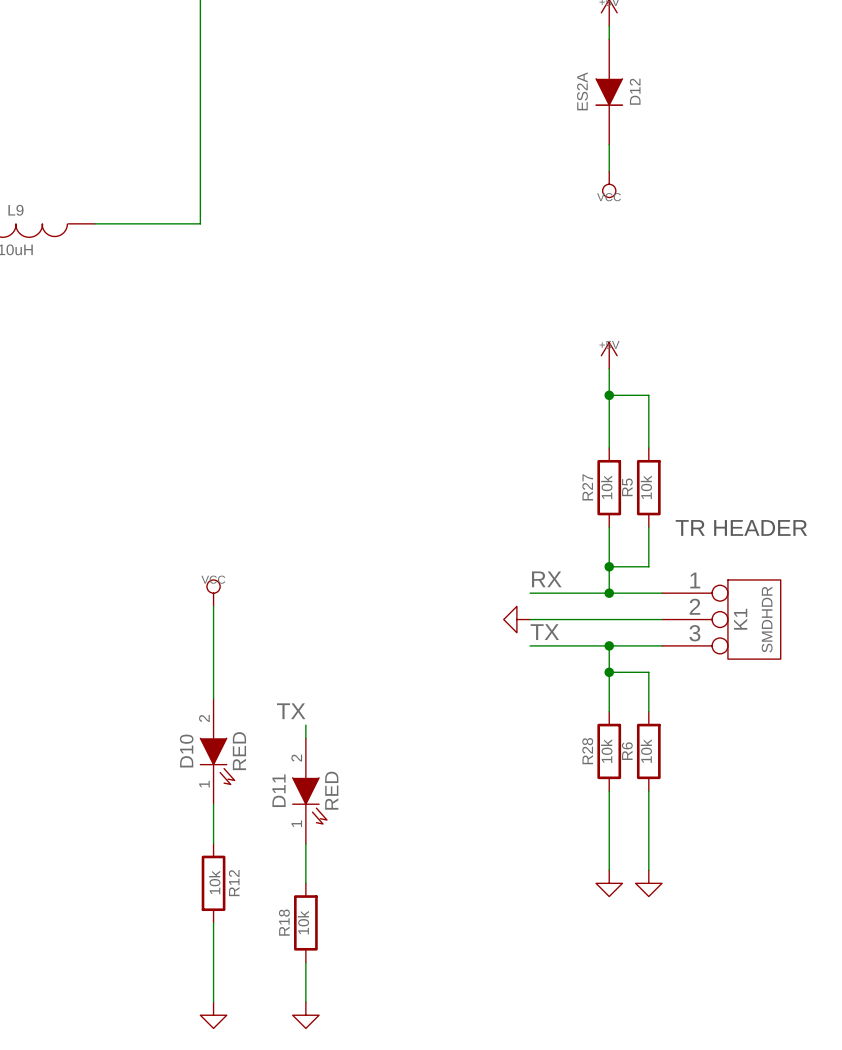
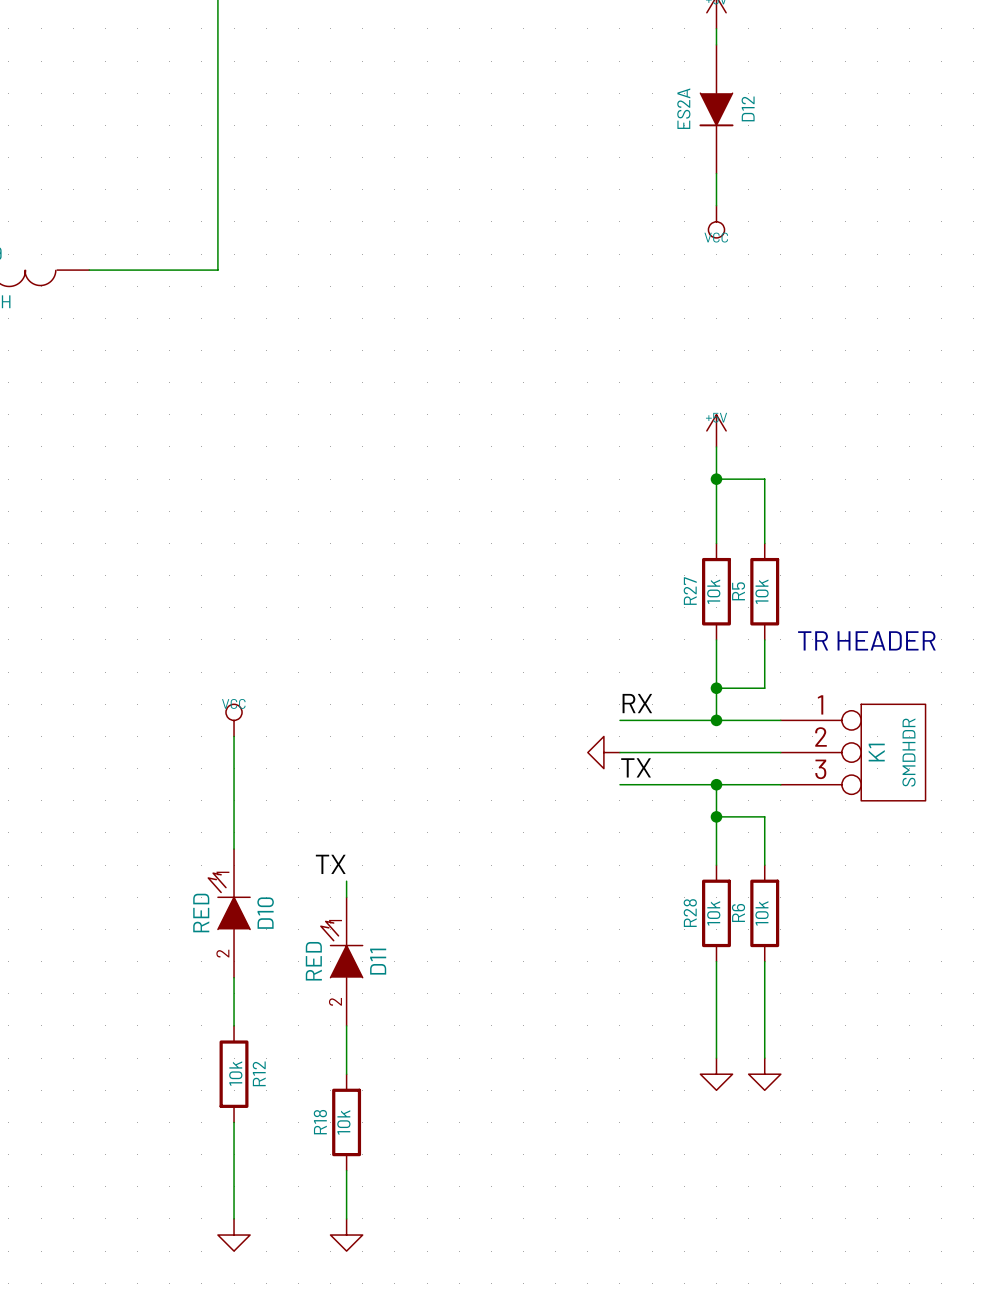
D10 rotation: 0° (217, 761) -> 180° (229, 901)
D11 rotation: 0° (309, 800) -> 180° (341, 949)

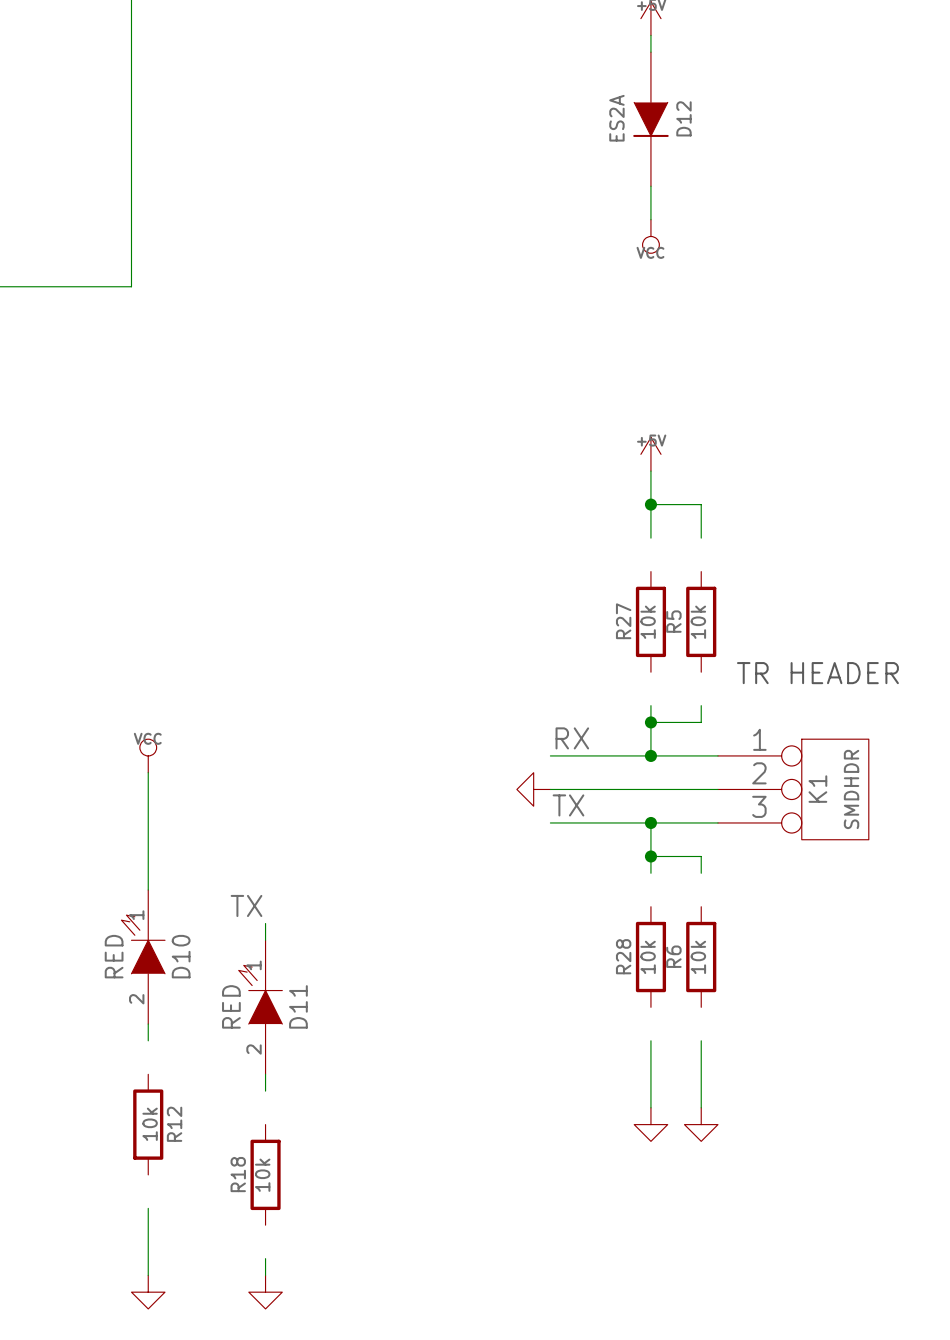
wire: (716, 511) (716, 543) -> none
wire: (764, 511) (764, 543) -> none
wire: (716, 639) (716, 672) -> none
wire: (764, 639) (764, 672) -> none
wire: (716, 832) (716, 865) -> none
wire: (764, 832) (764, 865) -> none
wire: (716, 961) (716, 993) -> none
wire: (764, 961) (764, 993) -> none
wire: (234, 993) (234, 1025) -> none
wire: (346, 1042) (346, 1074) -> none
wire: (234, 1122) (234, 1154) -> none
wire: (346, 1170) (346, 1202) -> none

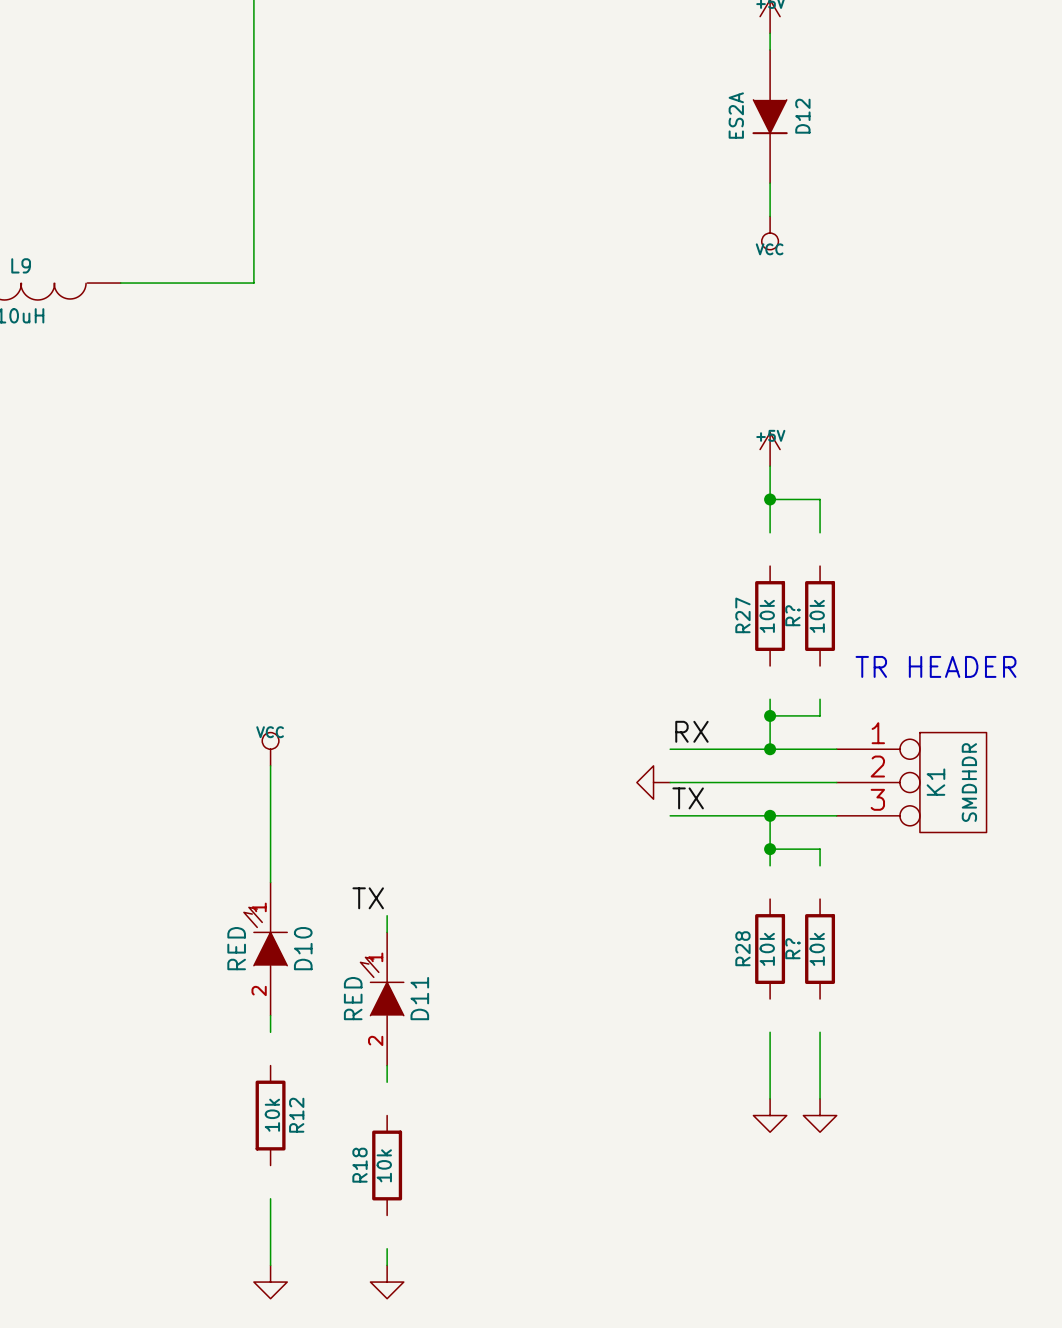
R5 name: R5 (673, 621) -> R? (792, 615)
R6 name: R6 (673, 956) -> R? (792, 948)

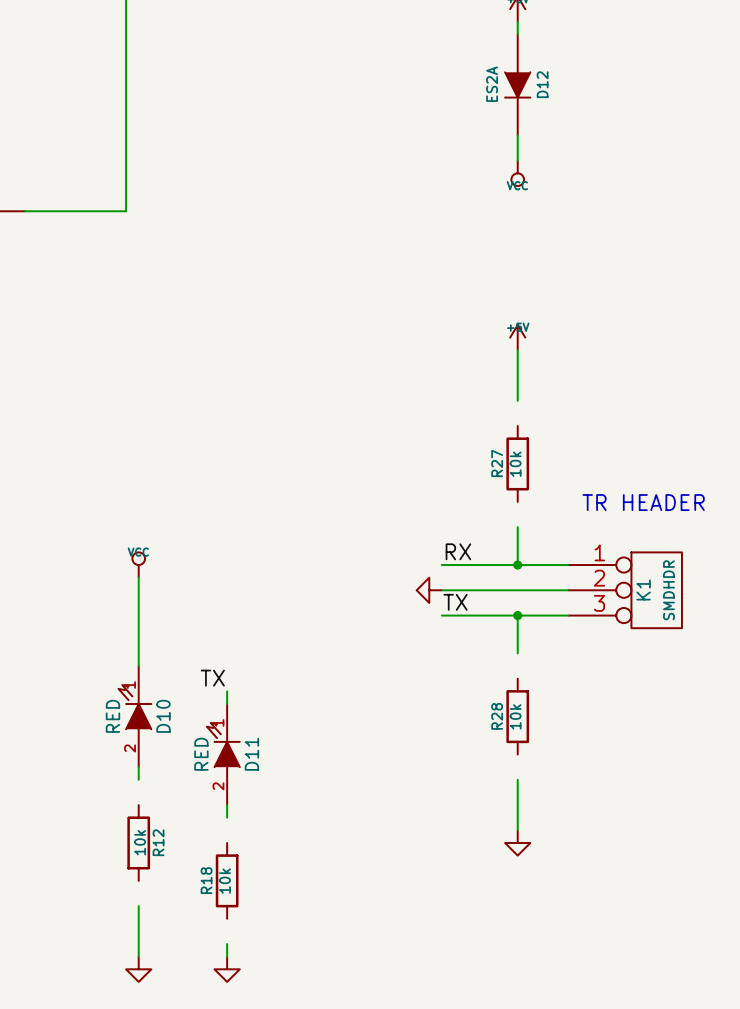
wire: (770, 499) (820, 499) (820, 532) -> none
junction: (770, 499) -> none
R?: 10k (820, 616) -> none
wire: (820, 699) (820, 715) (770, 715) -> none
junction: (770, 715) -> none
wire: (770, 849) (820, 849) (820, 865) -> none
junction: (770, 849) -> none
R?: 10k (820, 949) -> none
wire: (820, 1032) (820, 1098) -> none
power symbol: (820, 1115) -> none

